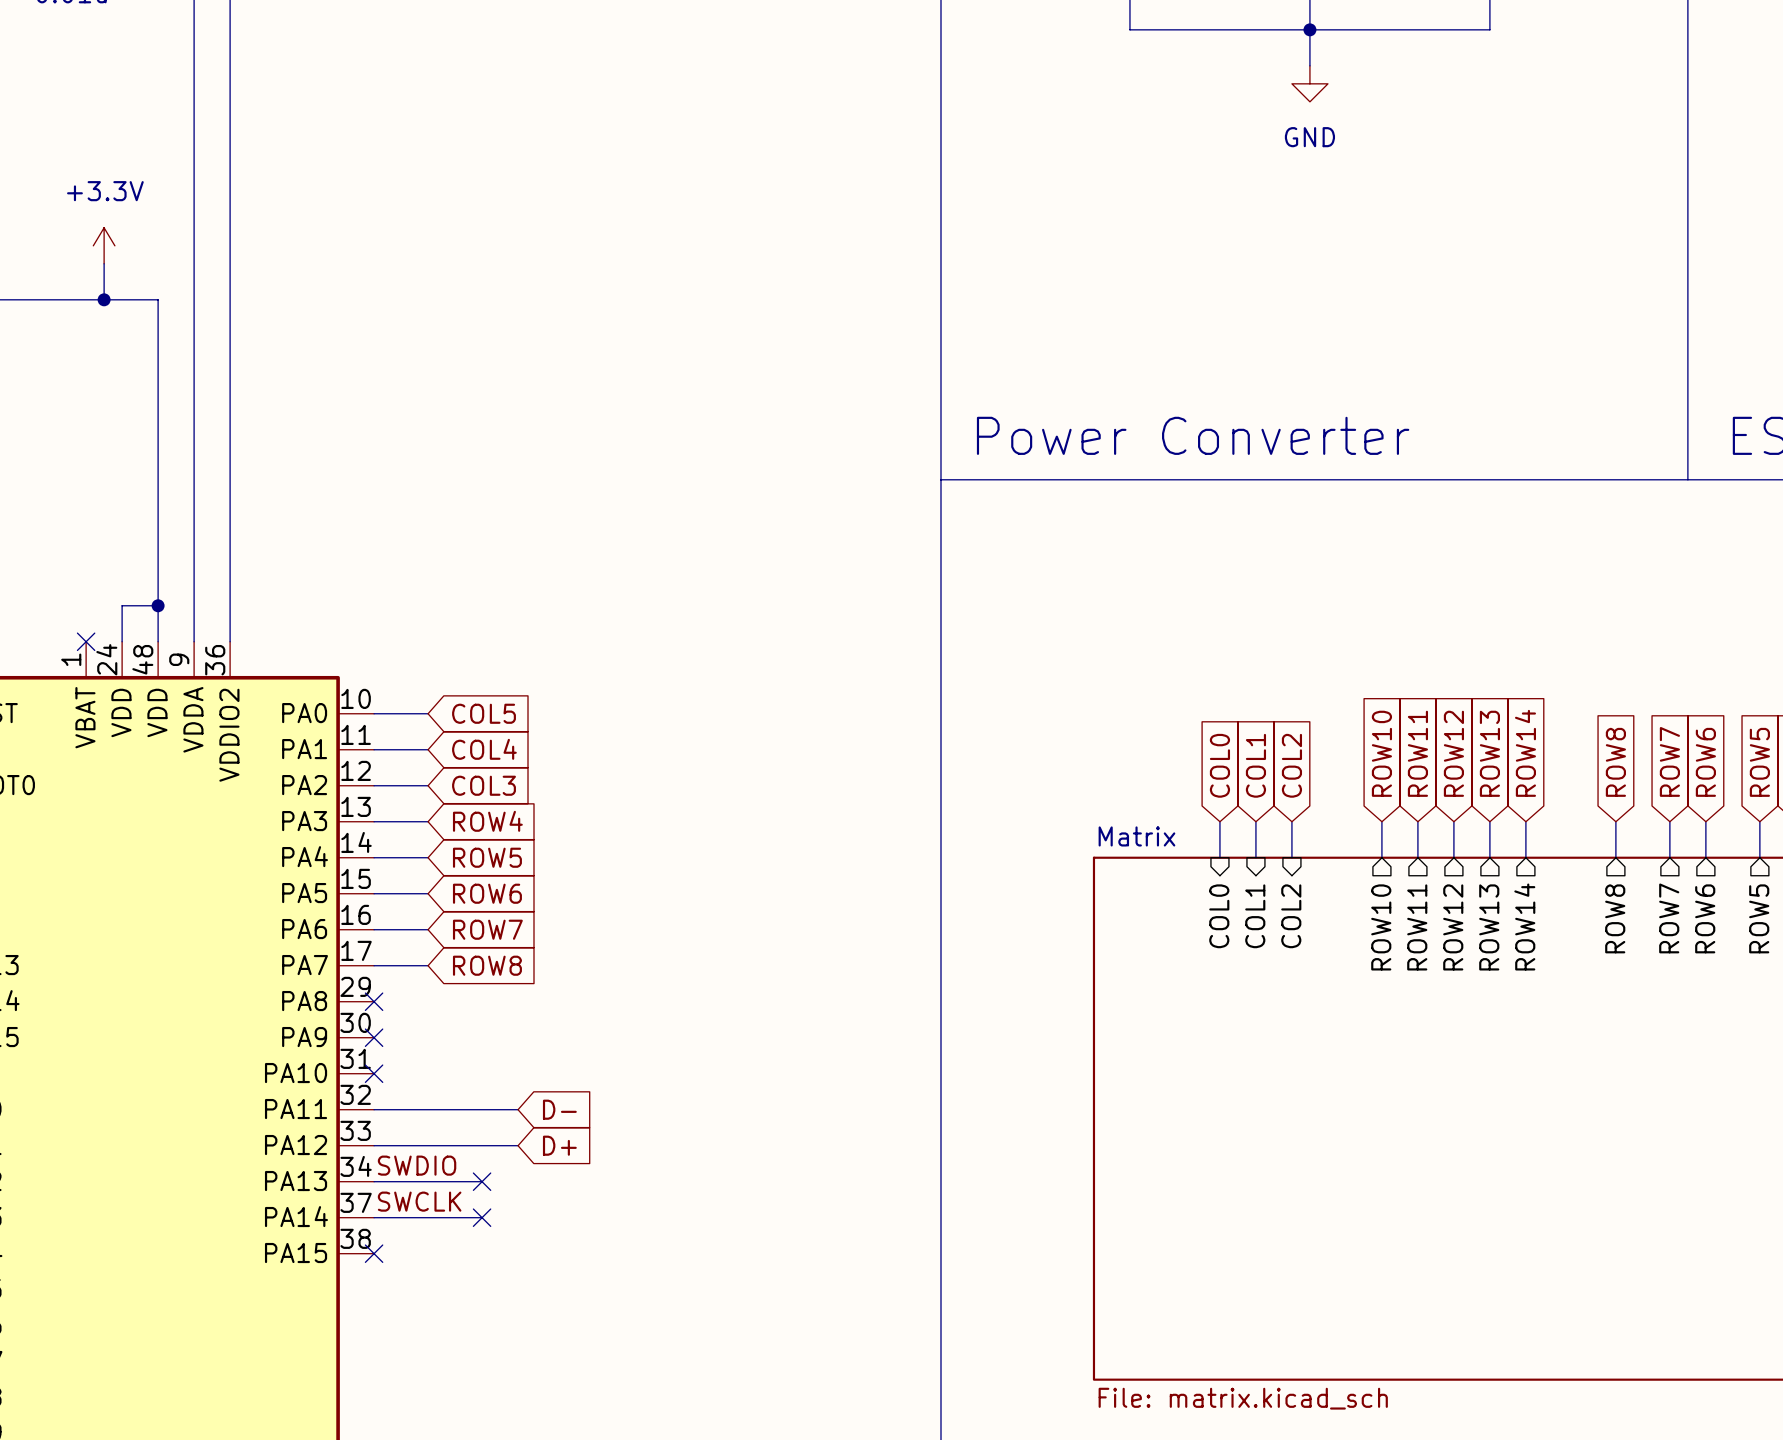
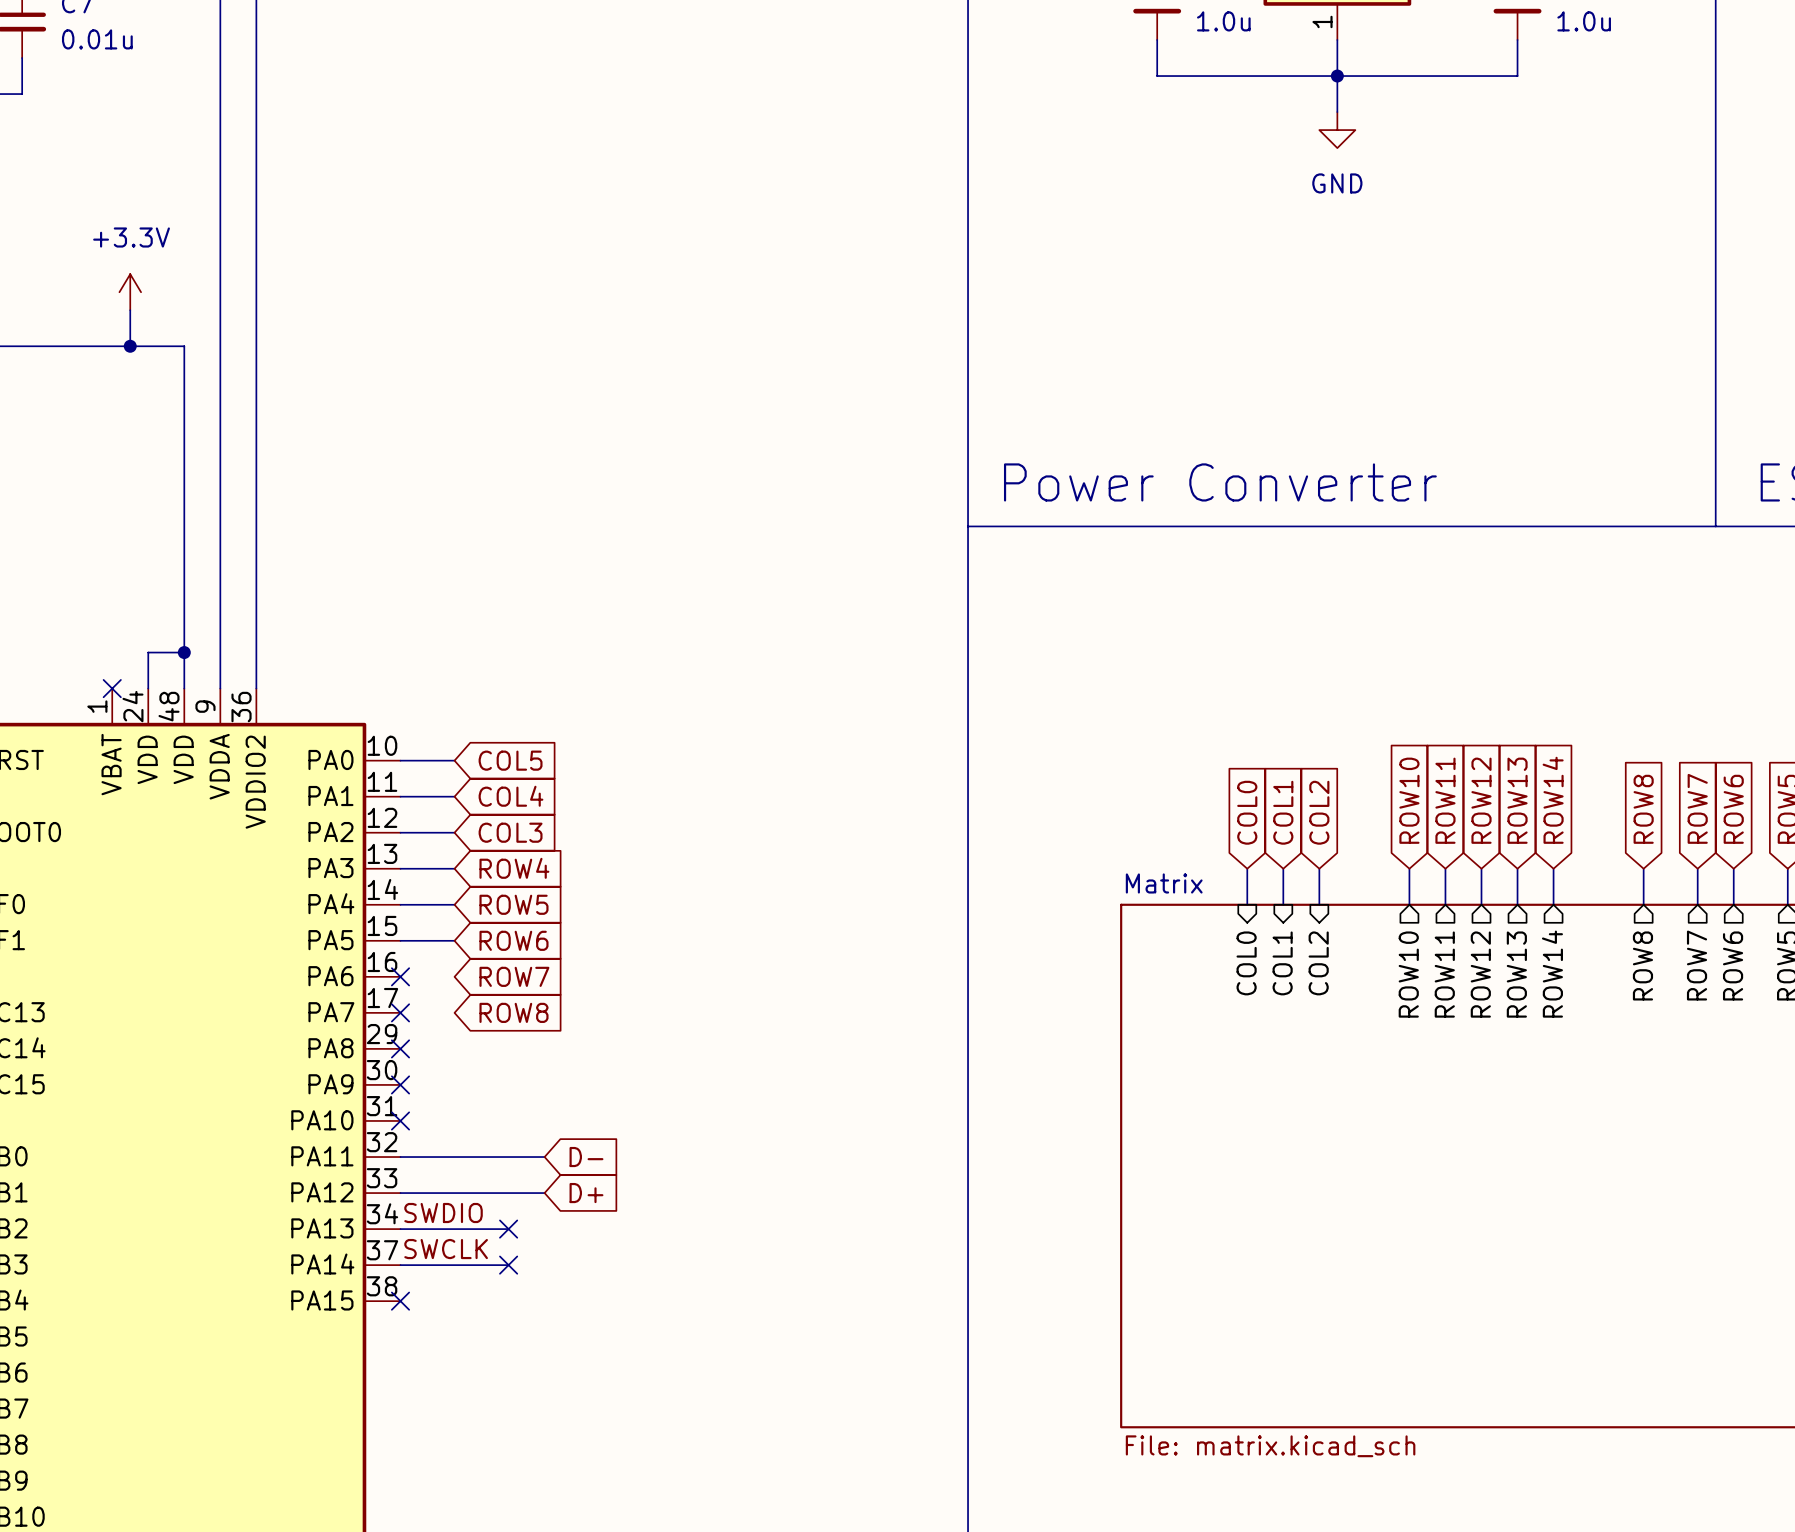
wire: (374, 929) (428, 929) -> none
no-connect mark: none -> (400, 976)
wire: (374, 965) (428, 965) -> none
no-connect mark: none -> (400, 1012)

